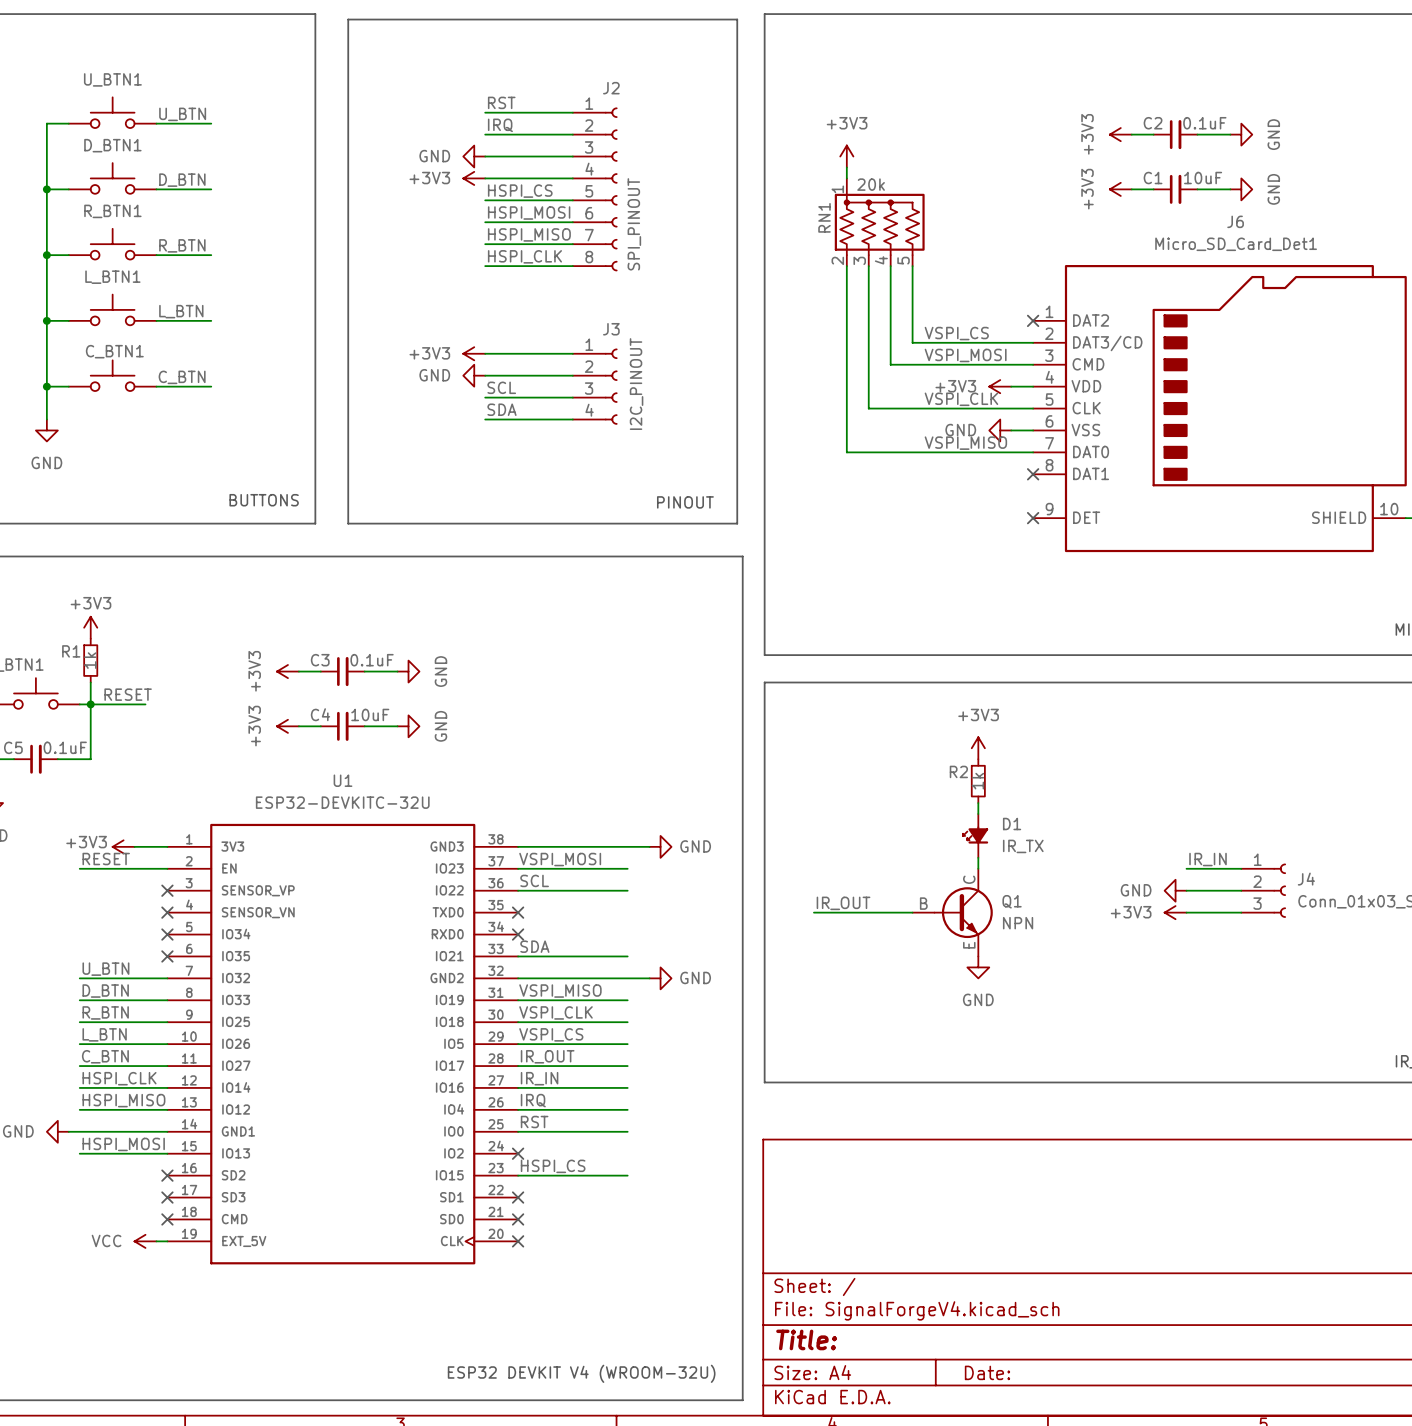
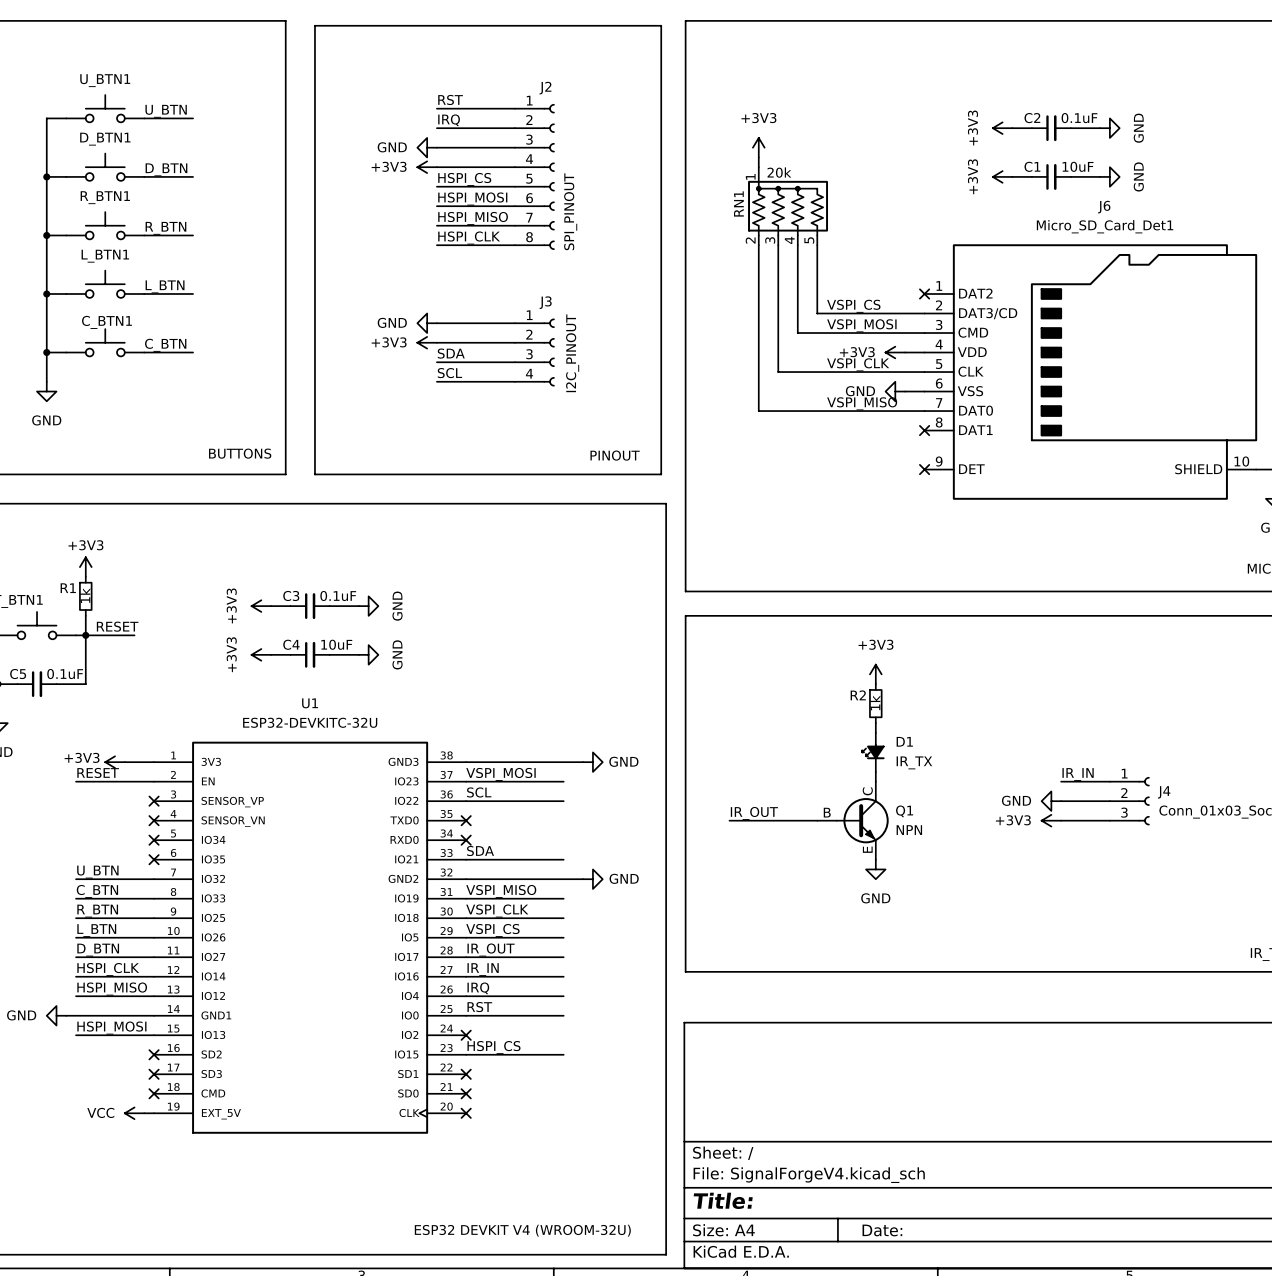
power symbol: +3V3 (474, 353) -> GND (427, 323)
power symbol: GND (474, 375) -> +3V3 (427, 342)
label: SCL (501, 387) -> SDA (451, 353)
label: SDA (501, 409) -> SCL (449, 373)
label: D_BTN (105, 991) -> C_BTN (97, 891)
label: C_BTN (105, 1056) -> D_BTN (98, 950)

